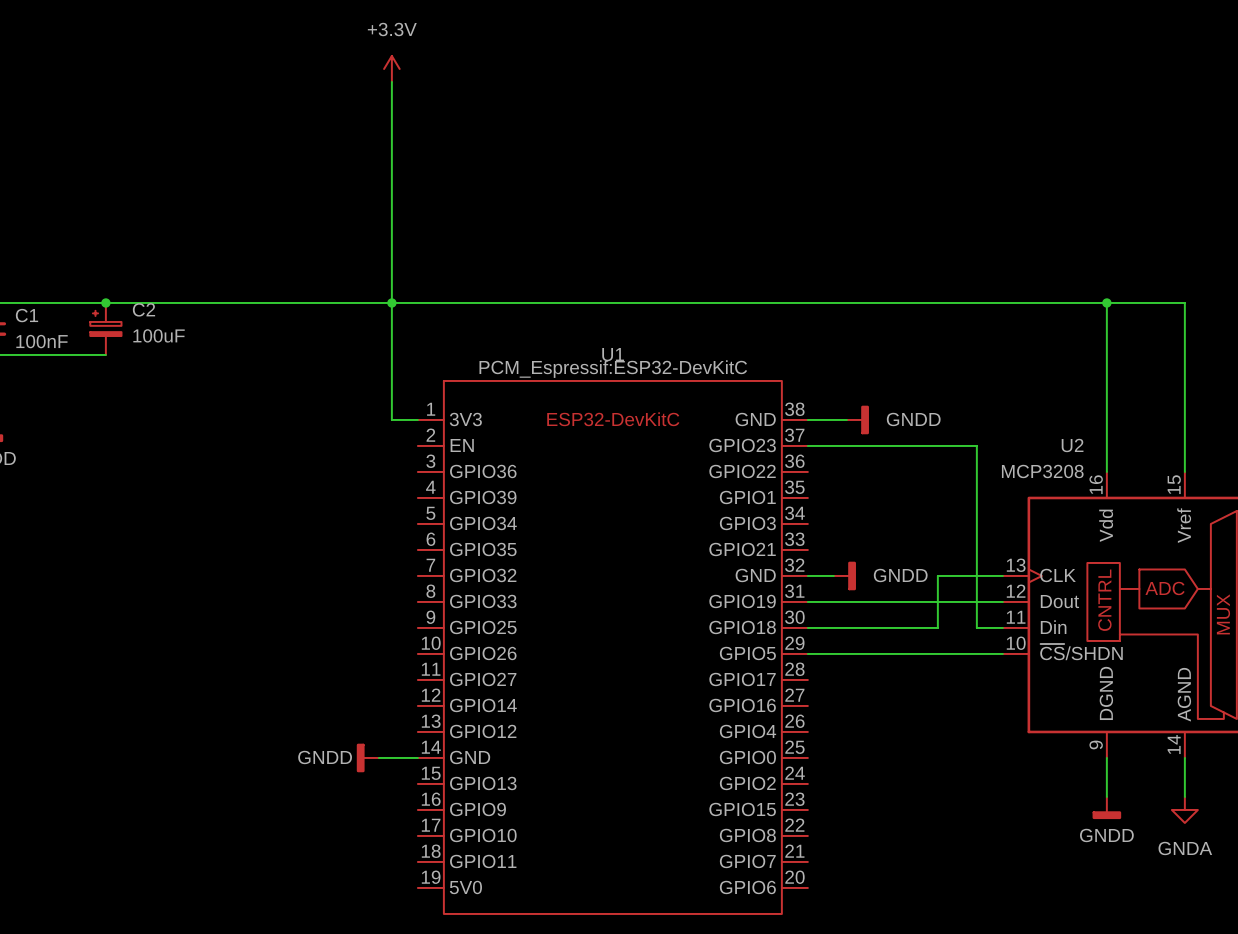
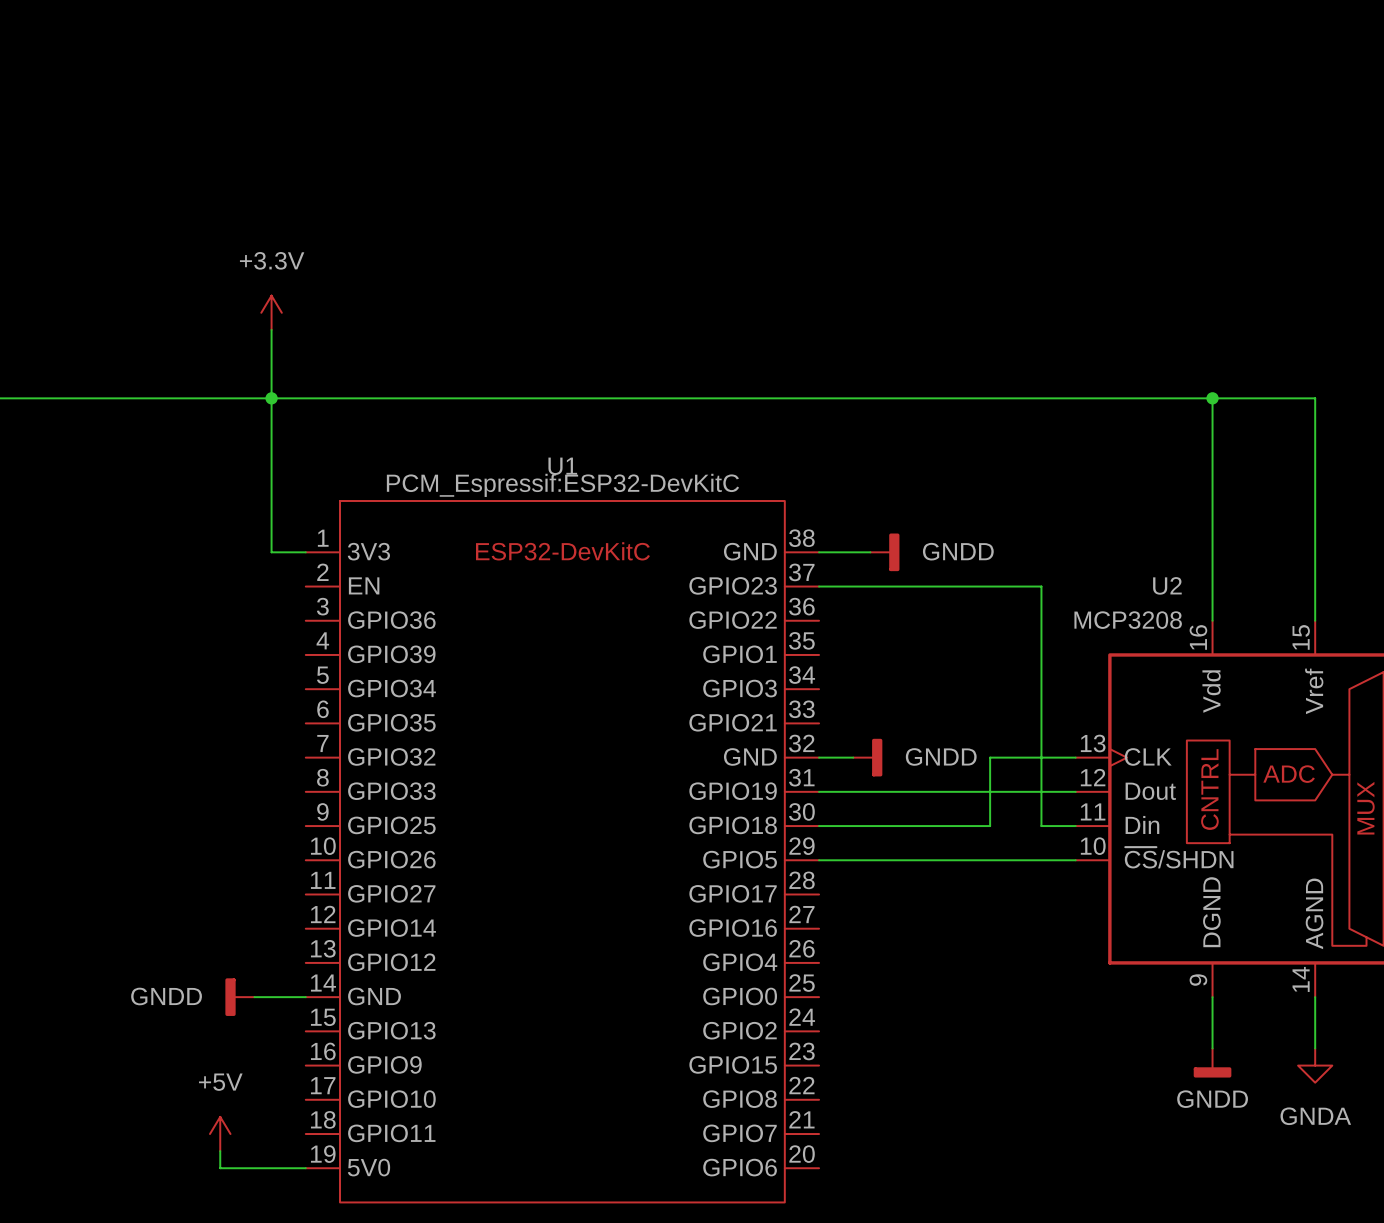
power symbol position: +3.3V (391, 68) -> +3.3V (271, 312)
wire: (391, 81) (391, 250) -> none
power symbol text position: GNDD (325, 757) -> GNDD (166, 996)
power symbol: none -> +5V (220, 1134)
wire: none -> (220, 1151) (220, 1168) (305, 1168)

